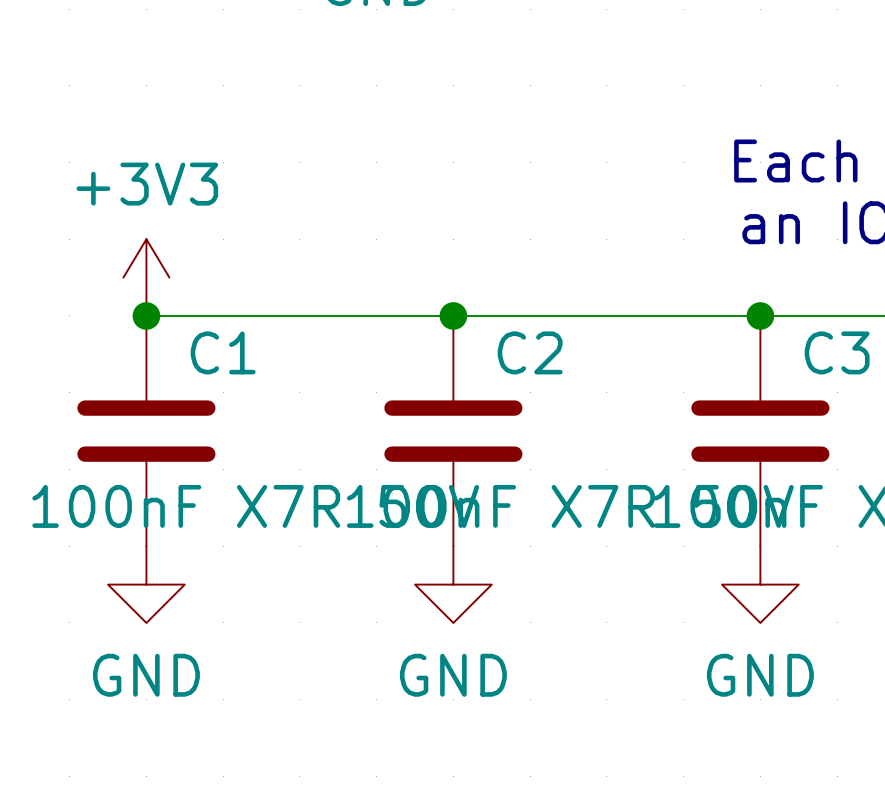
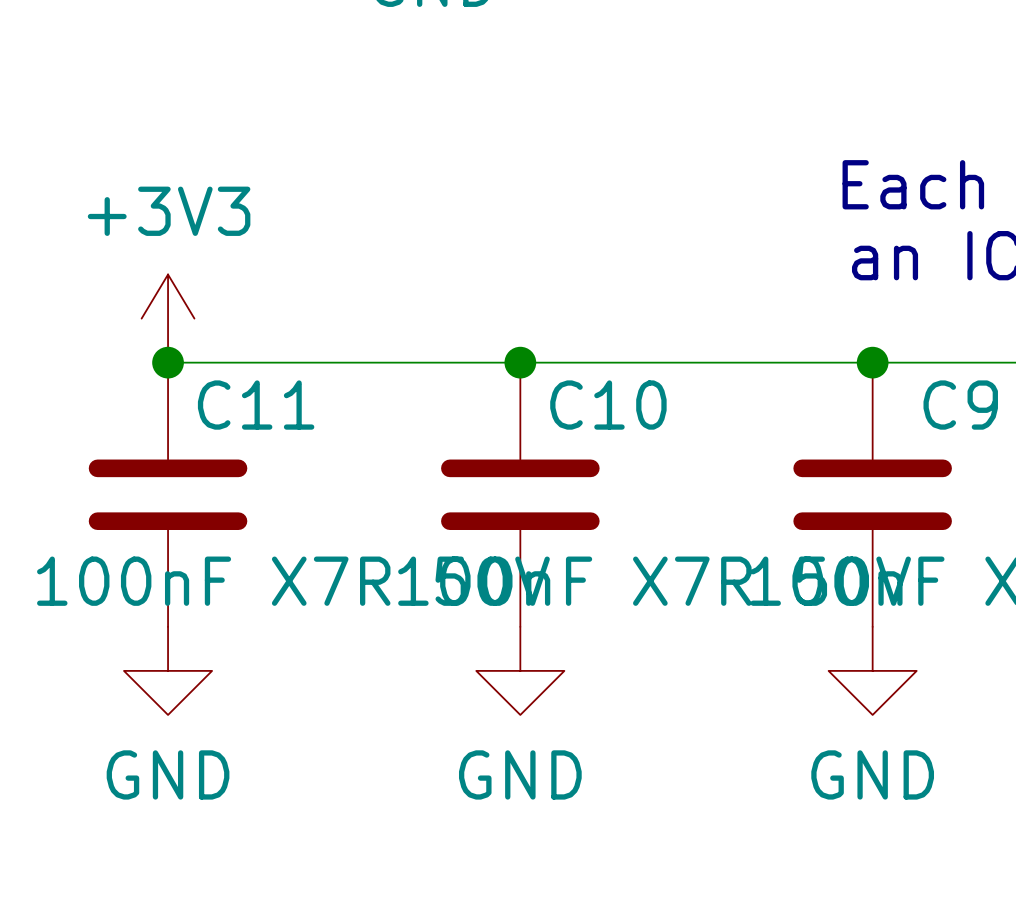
C1 name: C1 (223, 352) -> C11 (256, 405)
C2 name: C2 (530, 352) -> C10 (608, 405)
C3 name: C3 (837, 352) -> C9 (960, 405)

